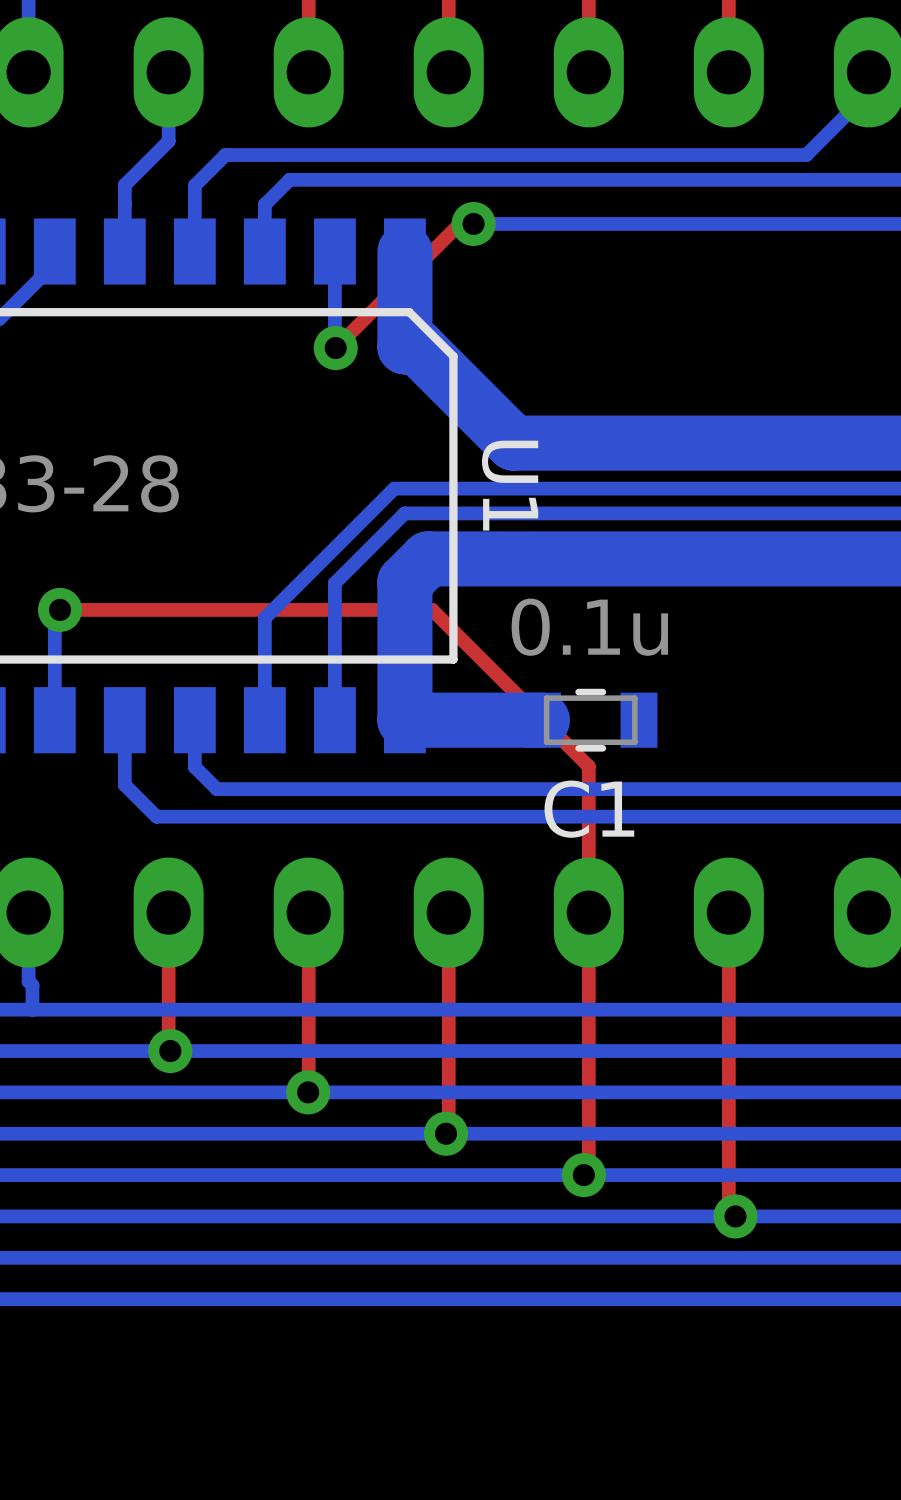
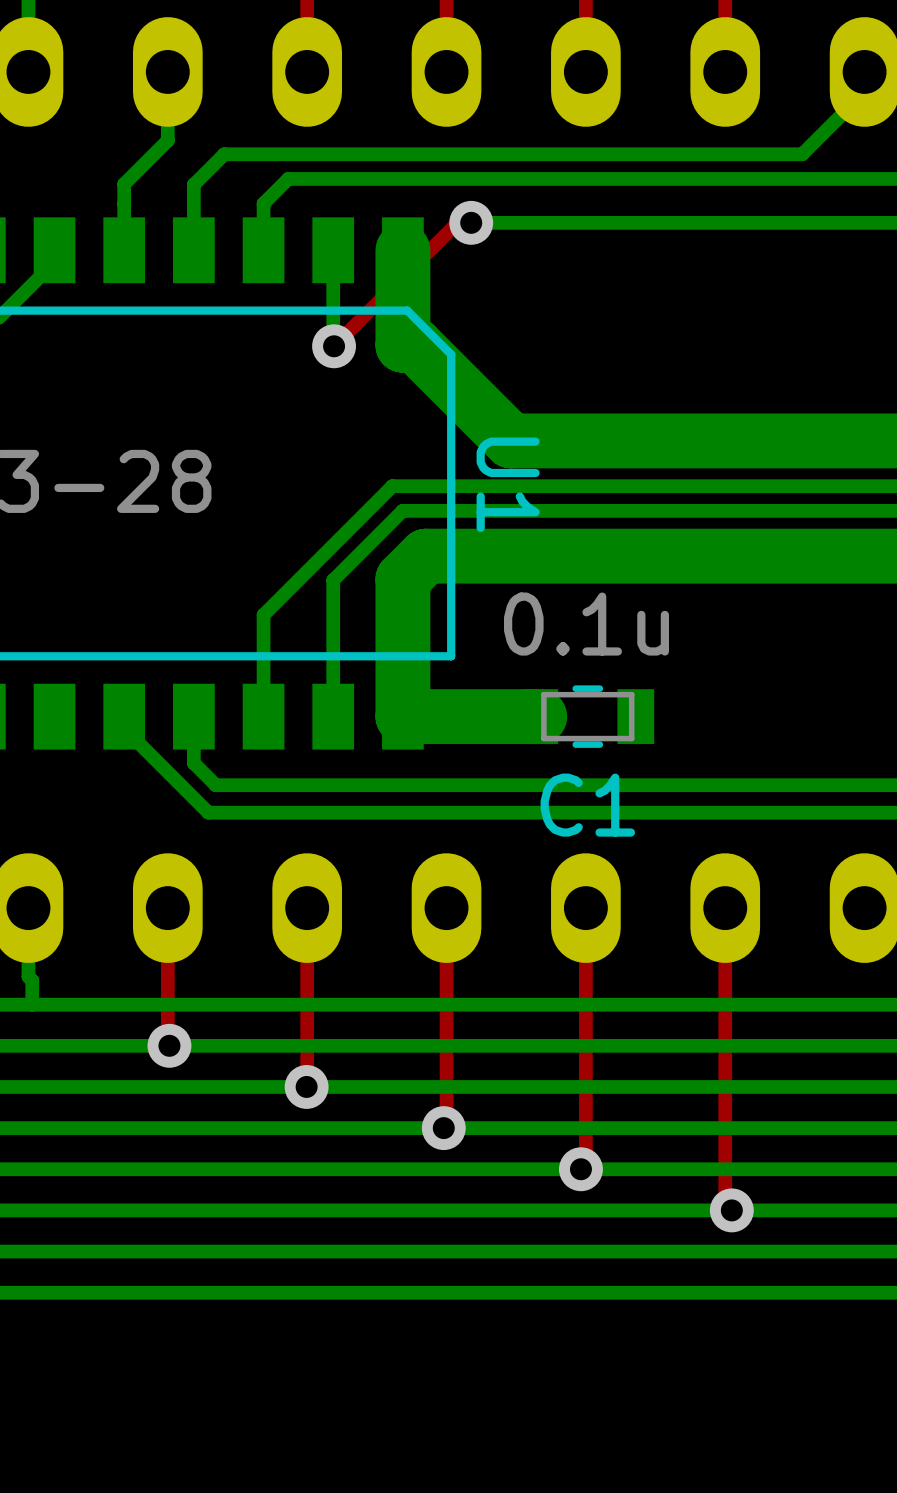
bottom track: (60, 609) (54, 615) (54, 720) -> none
top track: (60, 609) (432, 609) (588, 766) (588, 912) -> none
via: (60, 609) -> none
bottom track: (124, 732) (124, 784) (156, 816) (209, 816) -> (124, 728) (208, 812)

